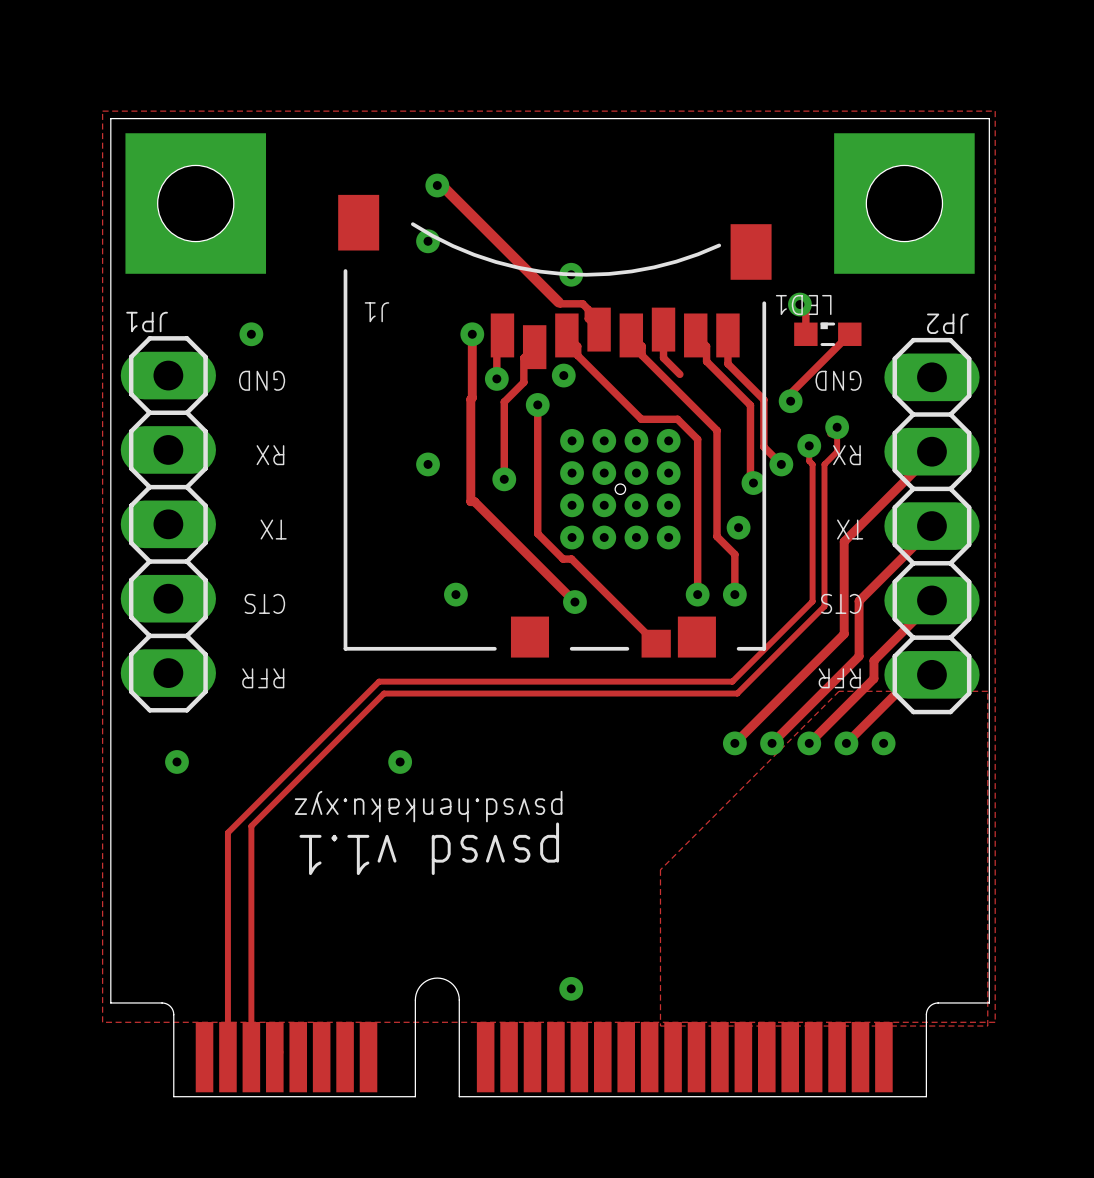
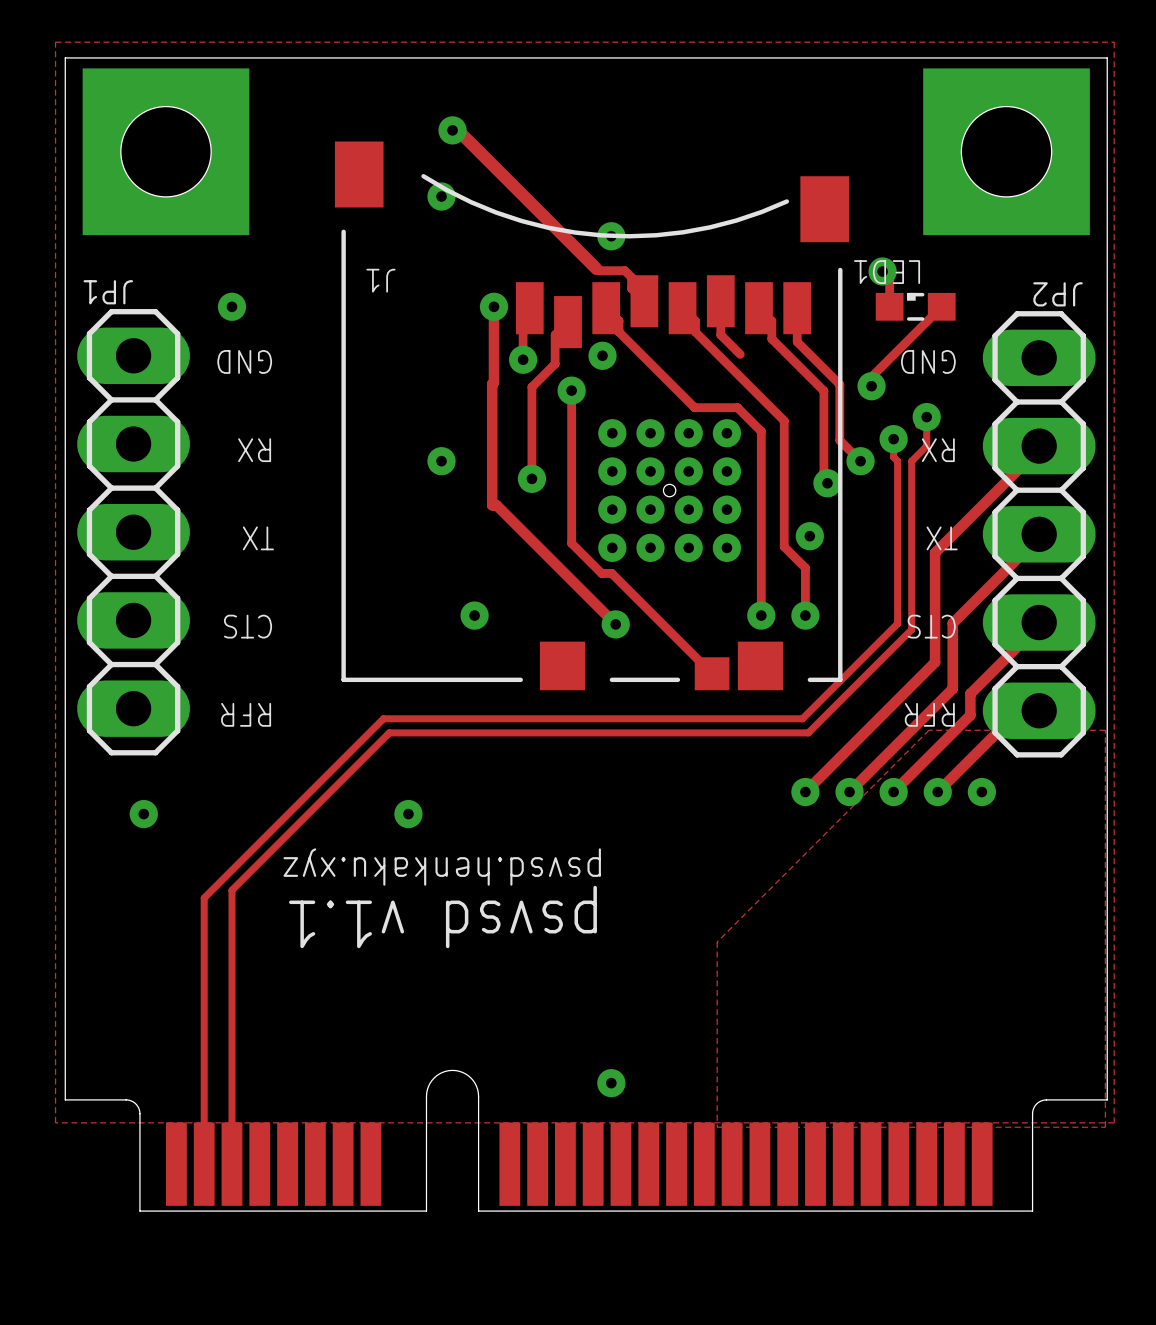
part footprint: [110, 118, 990, 1097] -> [65, 57, 1108, 1212]

